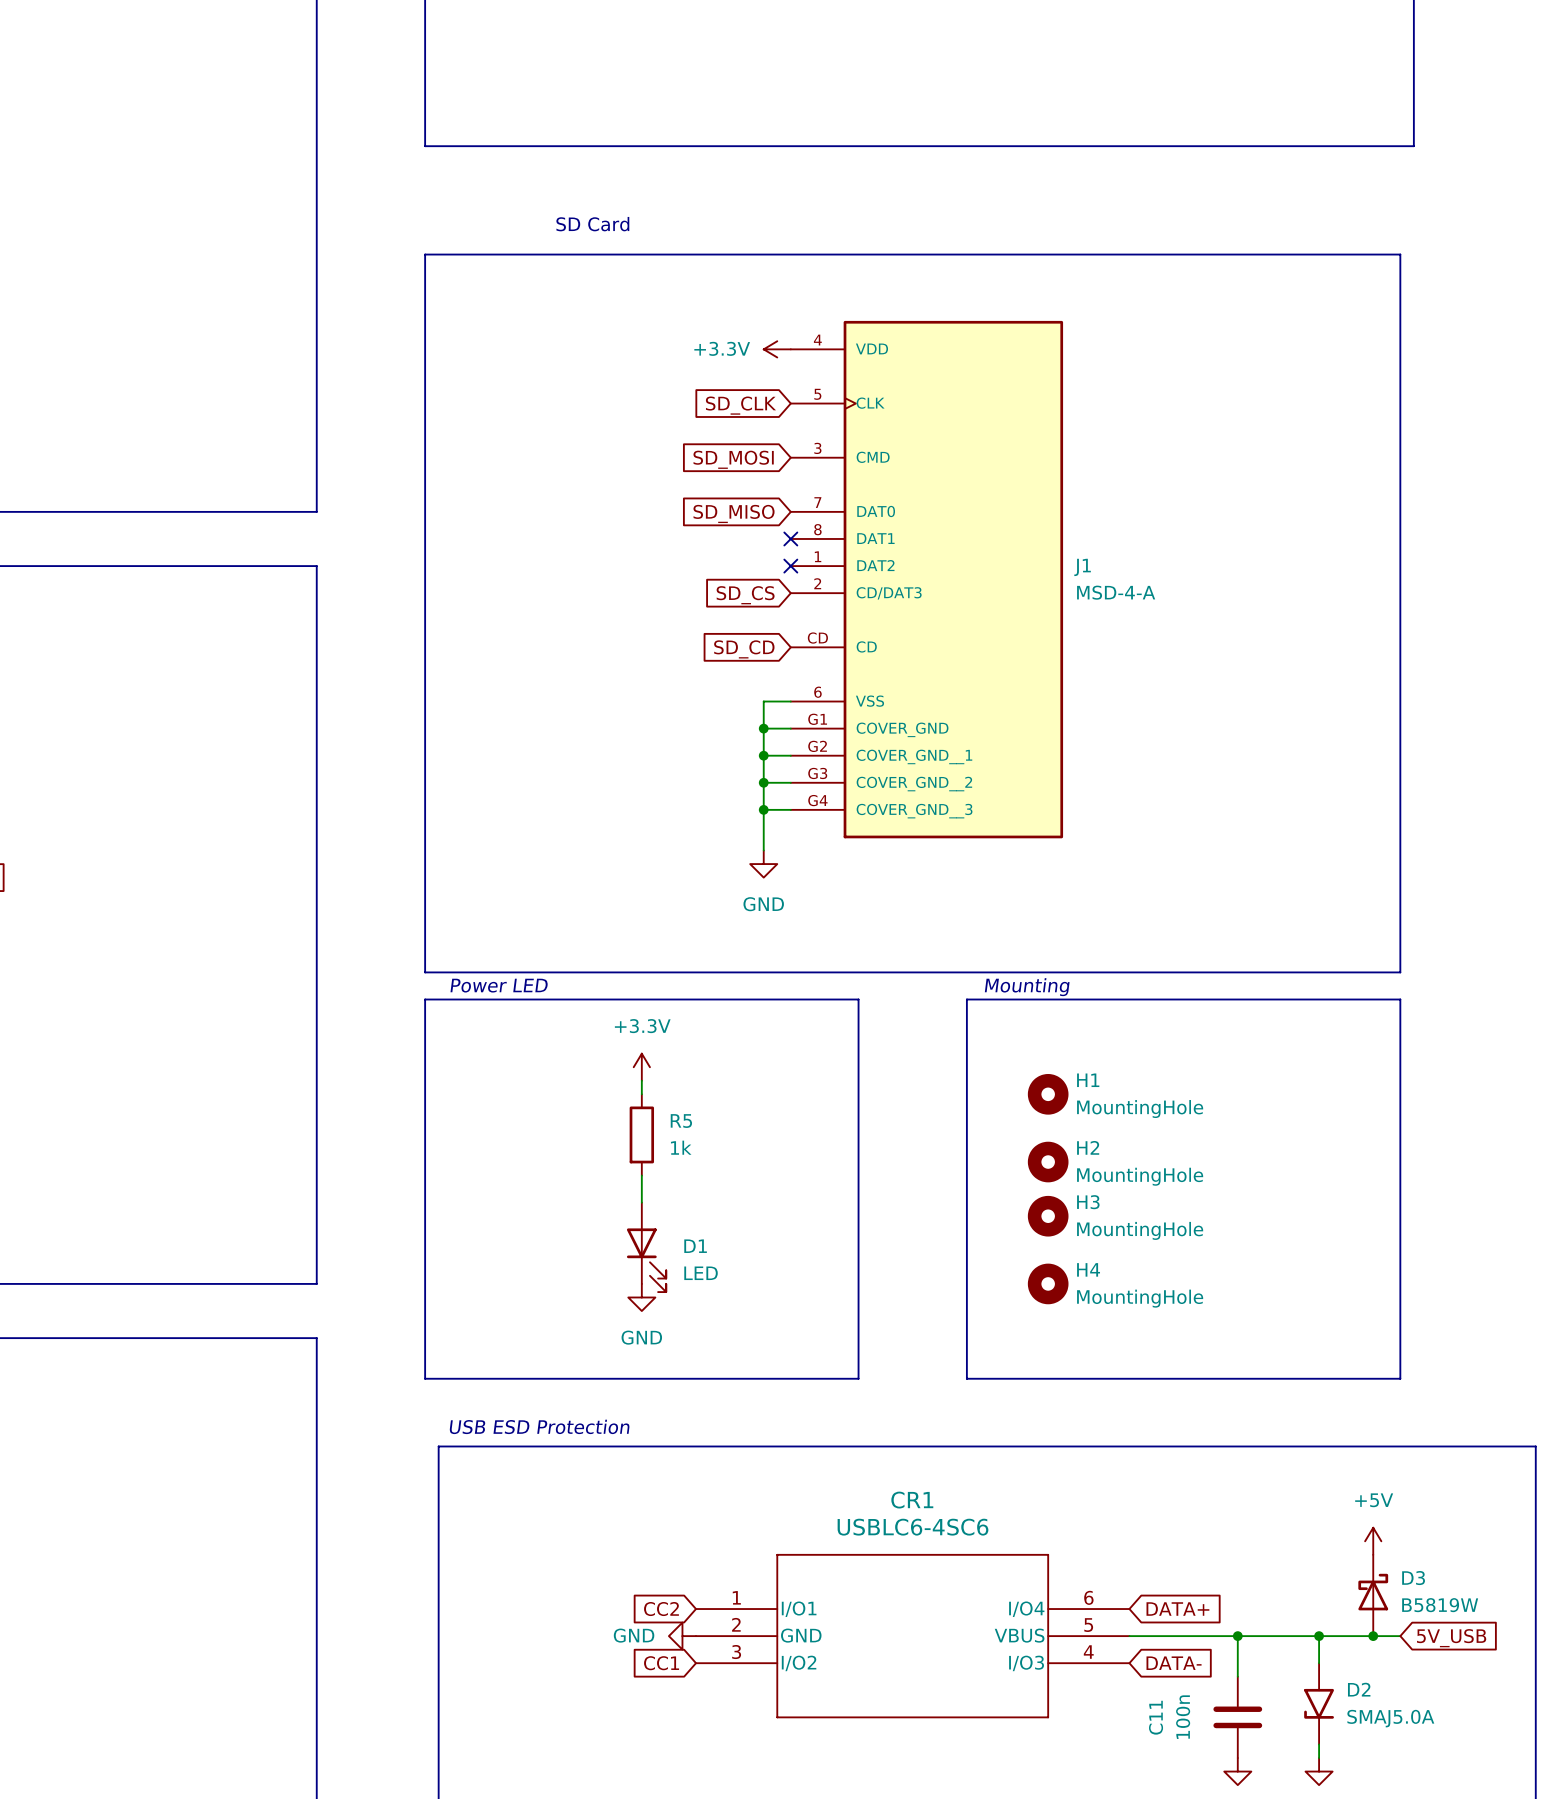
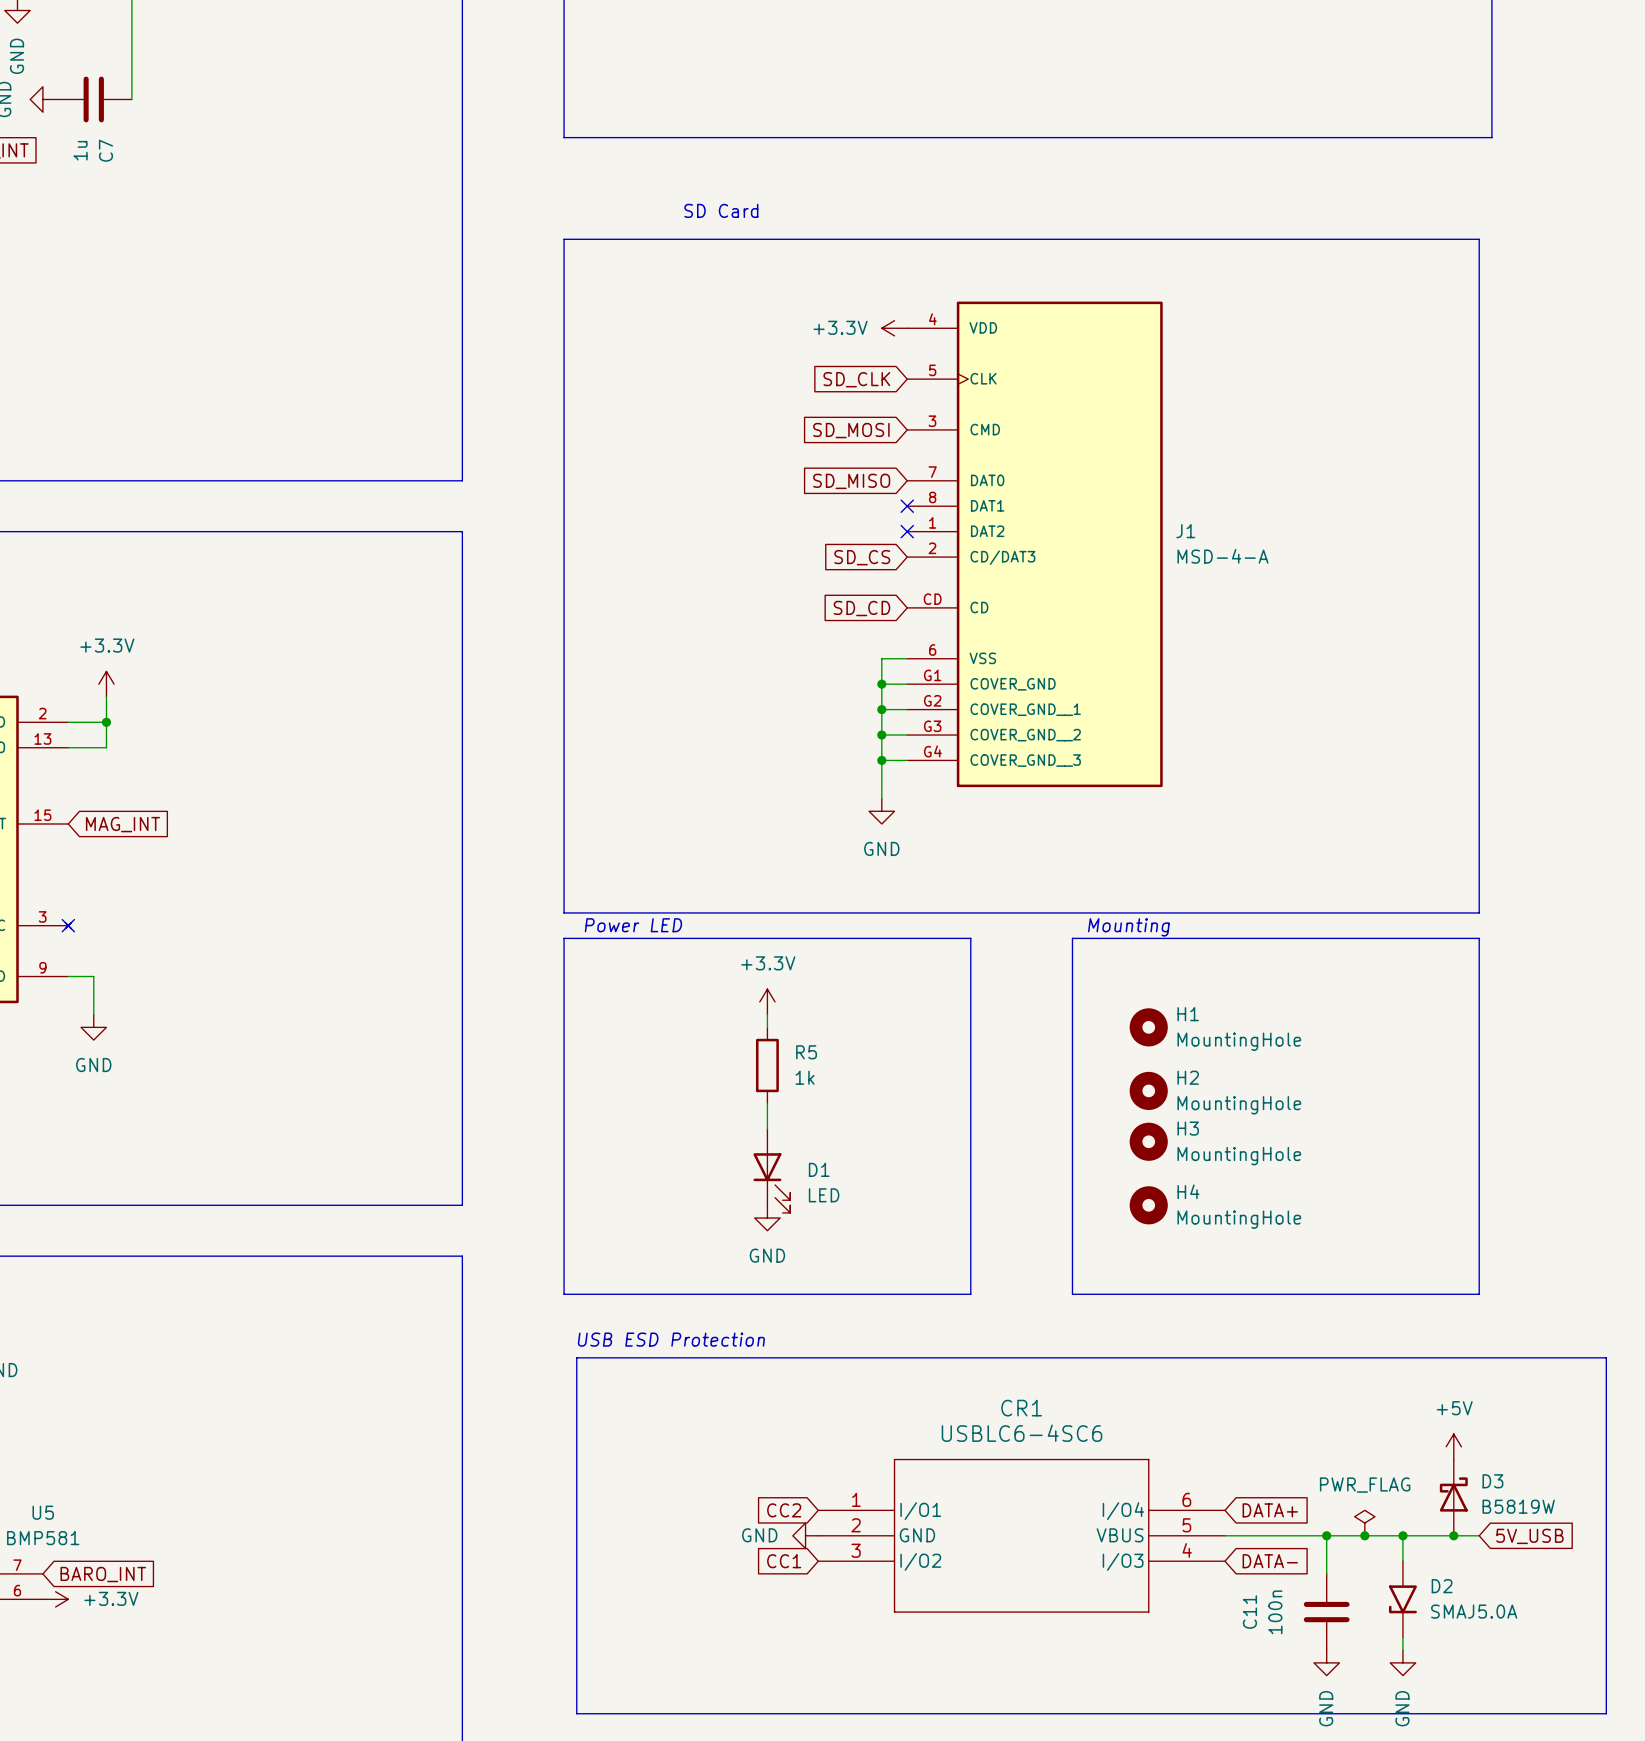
power symbol: none -> PWR_FLAG (1364, 1523)
junction: none -> (1364, 1535)

